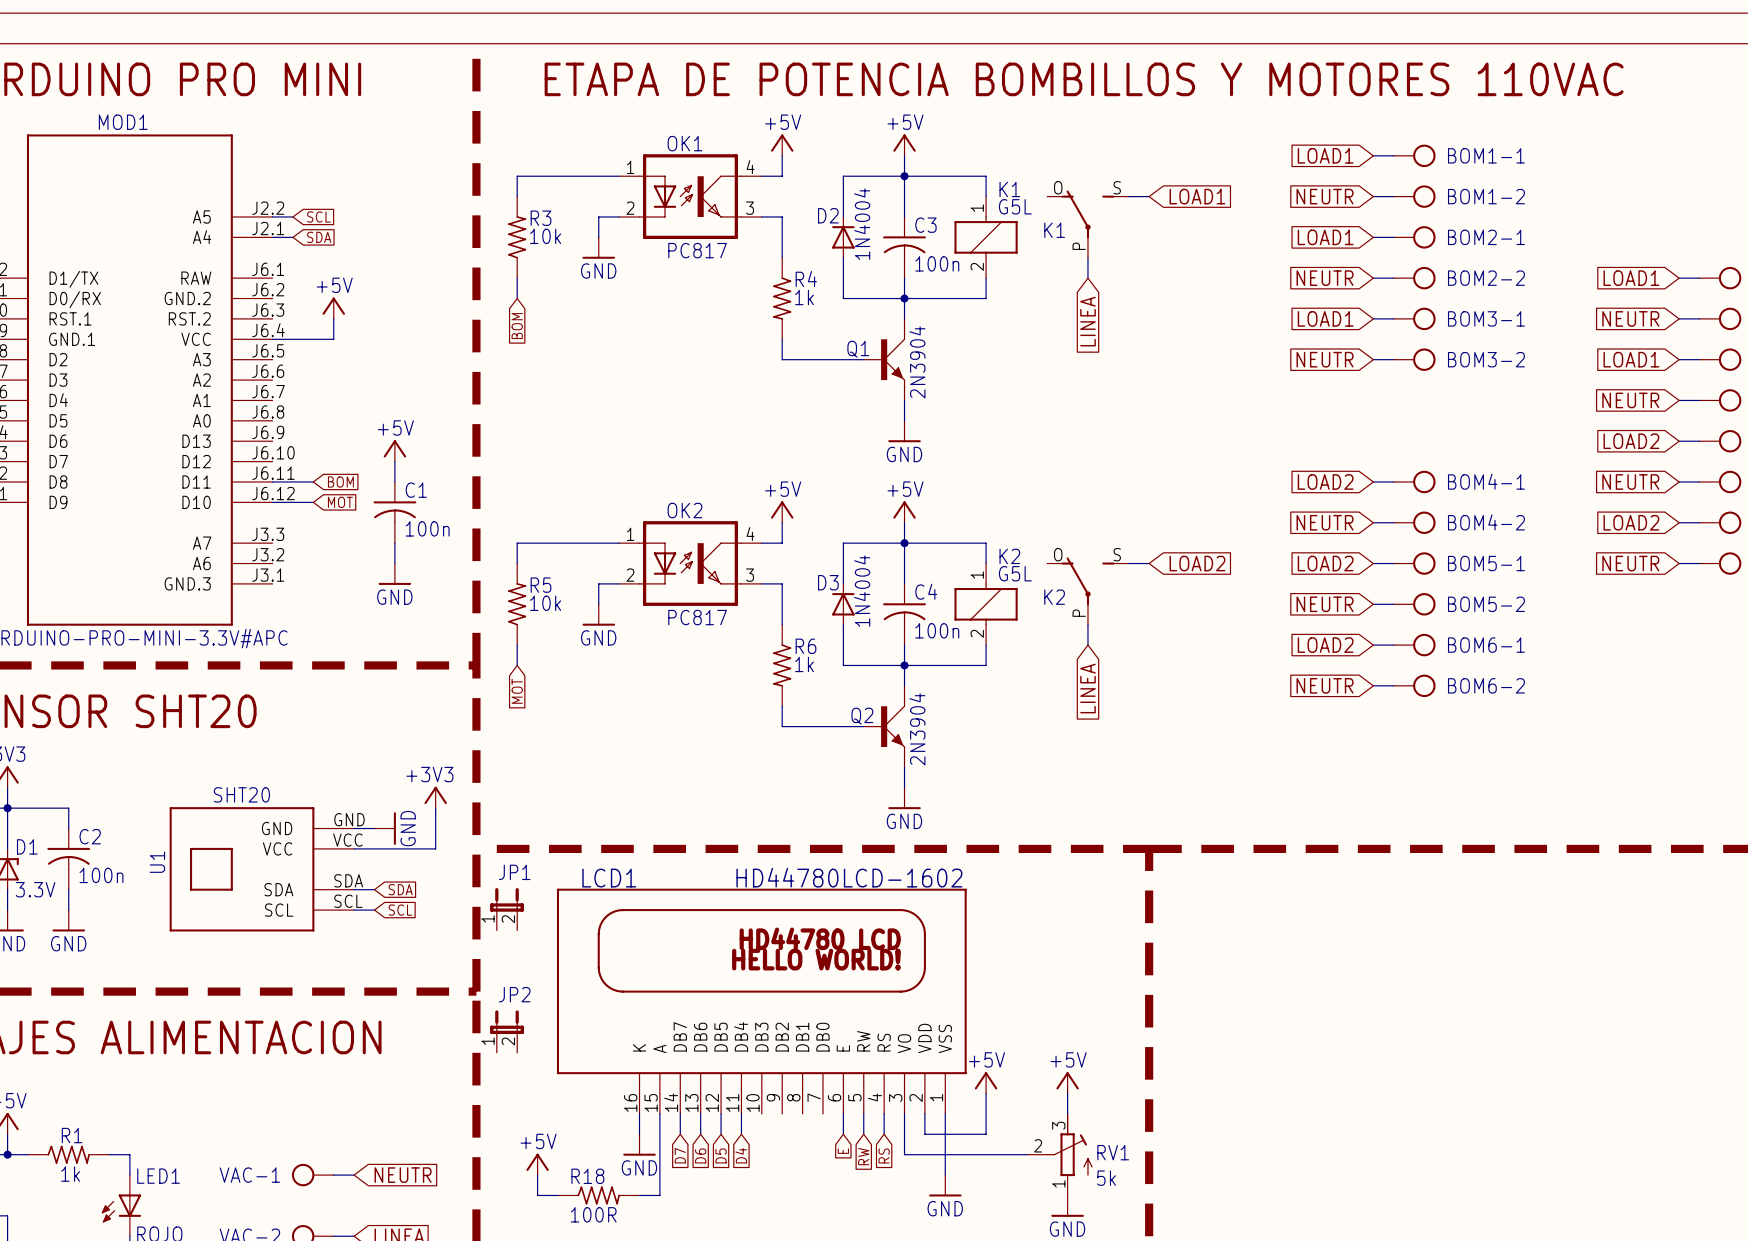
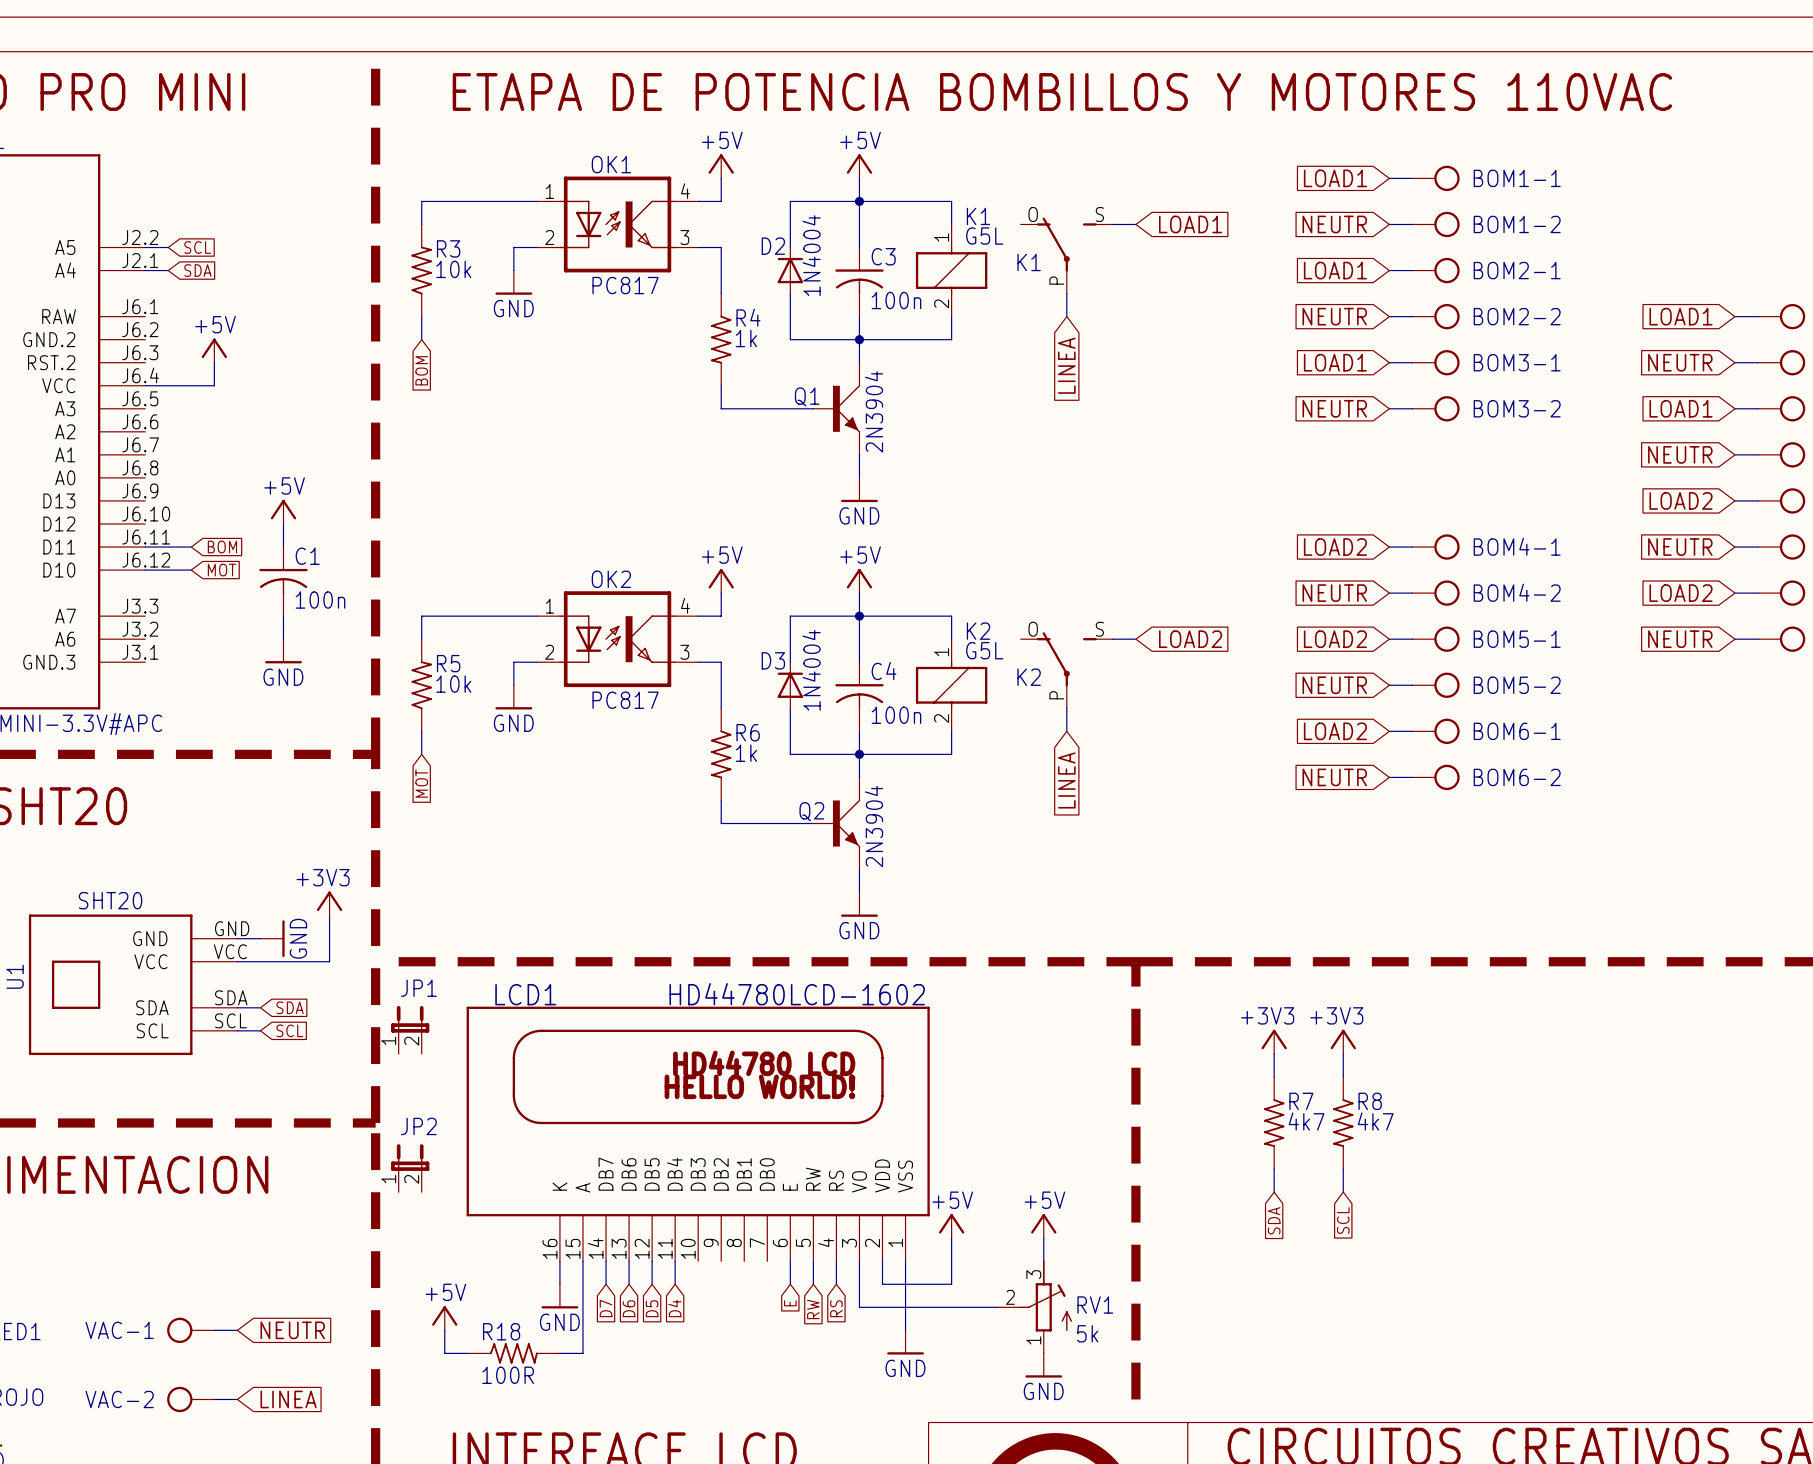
power symbol: none -> +3V3 (1274, 1041)
power symbol: none -> +3V3 (1343, 1041)
wire: none -> (1274, 1053) (1274, 1076)
wire: none -> (1343, 1053) (1343, 1076)
R7: none -> 4k7 (1274, 1123)
R8: none -> 4k7 (1343, 1123)
wire: none -> (1274, 1169) (1274, 1192)
wire: none -> (1343, 1169) (1343, 1192)
global label: none -> SCL (1343, 1220)
global label: none -> SDA (1274, 1220)

